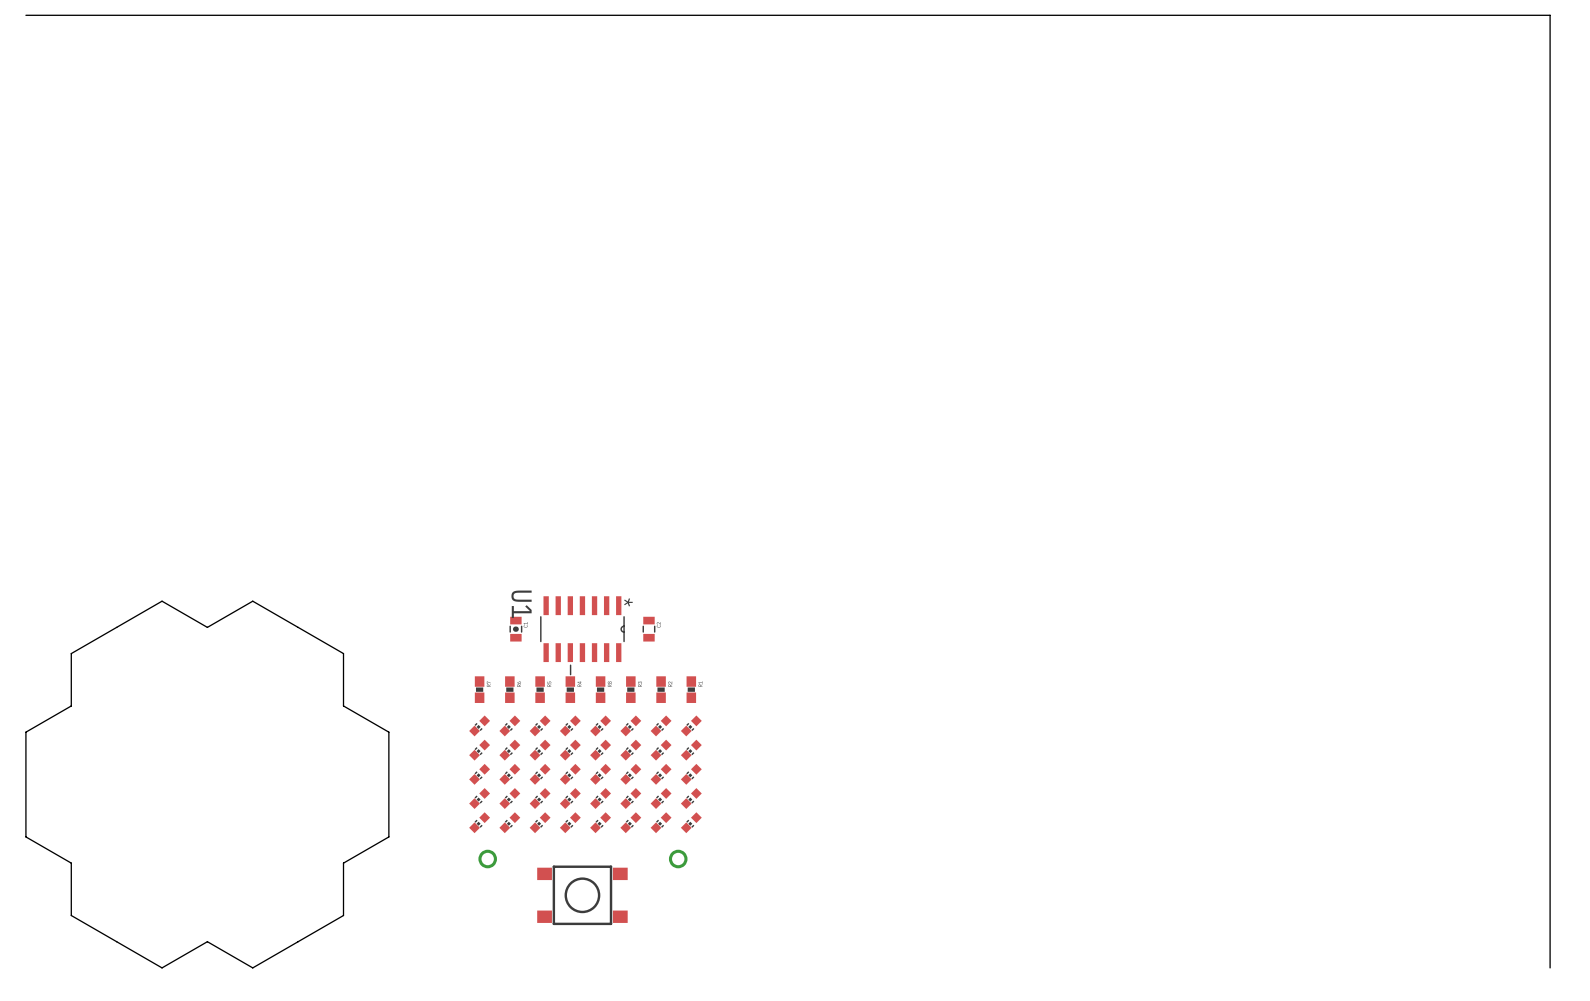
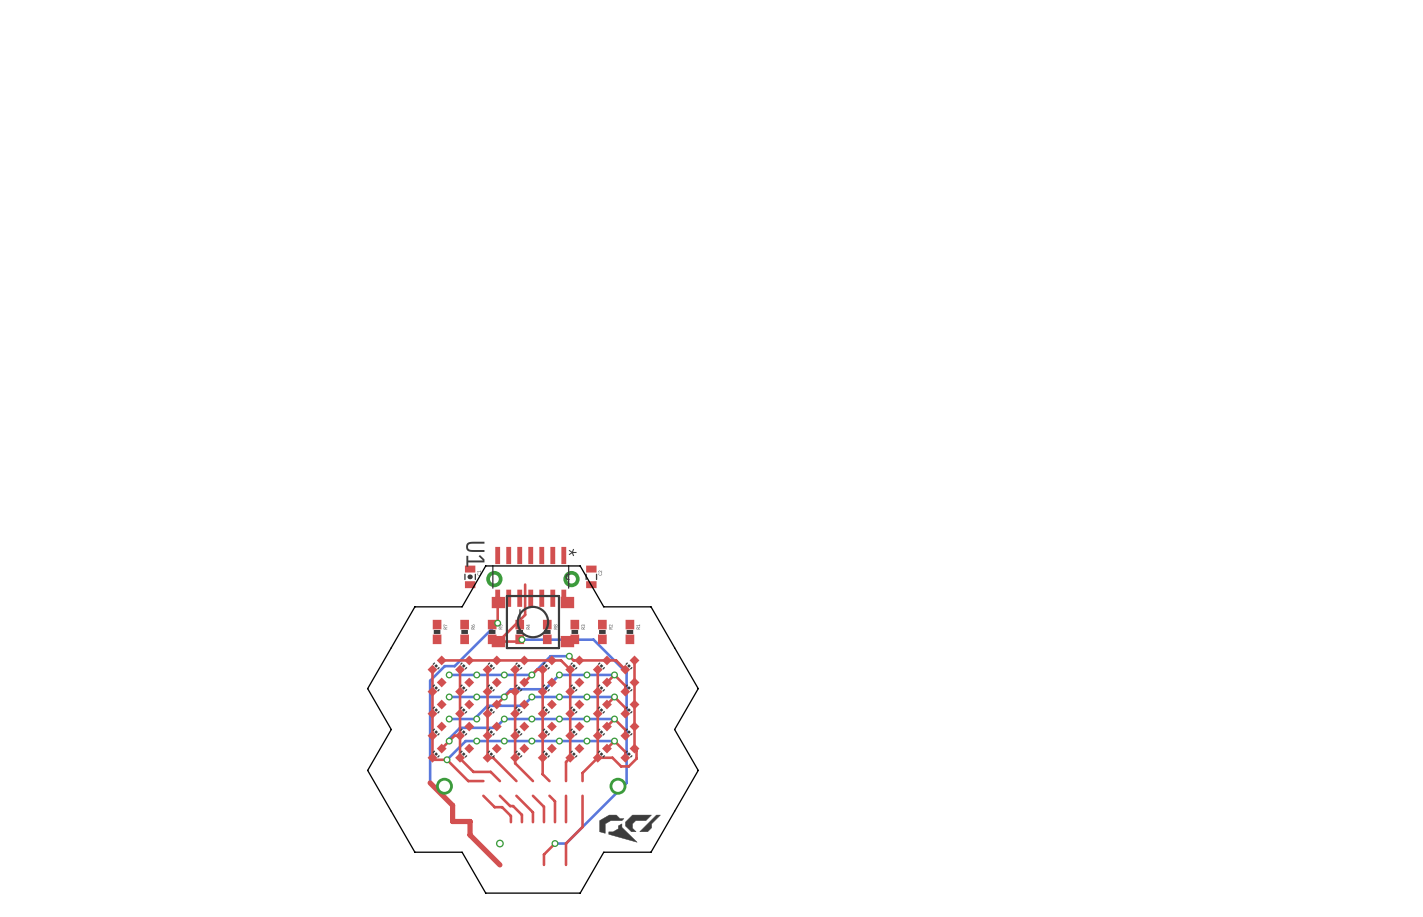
board edge: (25, 15) (1550, 15) (1550, 967) -> none
board edge: (162, 601) (207, 627) (252, 601) (343, 653) (343, 705) (388, 732) (388, 836) (343, 863) (343, 915) (252, 967) (207, 941) (162, 967) (71, 915) (71, 863) (25, 836) (25, 732) (71, 705) (71, 653) (162, 601) -> none
board edge: none -> (485, 565) (580, 565) (603, 606) (651, 606) (698, 688) (674, 729) (698, 770) (674, 811) (651, 852) (603, 852) (580, 893) (485, 893) (462, 852) (414, 852) (367, 770) (391, 729) (367, 688) (414, 606) (462, 606) (485, 565)
part: none -> (494, 579)
part: none -> (571, 579)
top track: none -> (525, 584) (525, 614) (498, 641) (520, 641) (521, 639)
top track: none -> (498, 602) (497, 623)
bottom track: none -> (497, 623) (454, 666) (444, 666) (430, 680) (430, 782)
via: none -> (497, 623)
bottom track: none -> (521, 639) (593, 639) (626, 672) (626, 782) (566, 843) (554, 843)
via: none -> (521, 639)
top track: none -> (569, 656) (573, 660) (616, 660) (625, 669)
bottom track: none -> (569, 656) (550, 656) (531, 674) (449, 674)
via: none -> (569, 656)
top track: none -> (441, 660) (561, 660) (570, 669) (570, 757) (566, 761) (566, 781)
top track: none -> (634, 660) (634, 748) (636, 750) (636, 758) (628, 766) (621, 766) (612, 757) (597, 757)
top track: none -> (432, 669) (432, 757) (434, 759) (447, 759) (468, 781) (483, 781)
top track: none -> (460, 669) (460, 758) (473, 771) (490, 771) (499, 781)
top track: none -> (487, 669) (487, 757) (493, 757) (516, 781)
top track: none -> (515, 669) (515, 763) (532, 781)
top track: none -> (597, 669) (597, 757)
via: none -> (449, 674)
via: none -> (476, 674)
via: none -> (504, 674)
via: none -> (531, 674)
via: none -> (559, 674)
via: none -> (586, 674)
bottom track: none -> (614, 674) (559, 674) (545, 689) (510, 689) (504, 696) (449, 696)
via: none -> (614, 674)
top track: none -> (524, 682) (537, 669) (542, 669) (542, 774) (549, 781)
top track: none -> (606, 682) (614, 674) (625, 685) (625, 691)
top track: none -> (515, 691) (509, 691) (496, 704)
via: none -> (449, 696)
via: none -> (476, 696)
via: none -> (504, 696)
via: none -> (531, 696)
via: none -> (559, 696)
via: none -> (586, 696)
bottom track: none -> (614, 696) (531, 696) (523, 705) (487, 705) (476, 716) (476, 719) (449, 719)
via: none -> (614, 696)
top track: none -> (606, 704) (614, 696) (625, 707) (625, 713)
via: none -> (449, 719)
via: none -> (476, 719)
via: none -> (504, 719)
via: none -> (531, 719)
via: none -> (559, 719)
via: none -> (586, 719)
bottom track: none -> (614, 719) (504, 719) (495, 727) (460, 727) (449, 738) (449, 741)
via: none -> (614, 719)
top track: none -> (606, 726) (614, 719) (625, 729) (625, 735)
top track: none -> (460, 735) (454, 735) (441, 748)
via: none -> (449, 741)
via: none -> (476, 741)
via: none -> (504, 741)
via: none -> (531, 741)
via: none -> (559, 741)
via: none -> (586, 741)
bottom track: none -> (614, 741) (465, 741) (447, 759)
via: none -> (614, 741)
top track: none -> (606, 748) (614, 741) (625, 751) (625, 757)
top track: none -> (597, 757) (582, 773) (582, 781)
via: none -> (447, 759)
top track: none -> (430, 782) (452, 805) (452, 821) (470, 821) (470, 835) (499, 864)
top track: none -> (483, 795) (494, 807) (502, 807) (510, 815) (510, 822)
top track: none -> (499, 795) (521, 814) (521, 822)
top track: none -> (516, 795) (532, 812) (532, 822)
top track: none -> (532, 795) (543, 806) (543, 822)
top track: none -> (549, 795) (554, 801) (554, 822)
top track: none -> (566, 795) (566, 822)
top track: none -> (582, 795) (582, 827) (566, 843) (566, 864)
drawing: none -> [599, 814, 661, 843]
part position: (582, 895) -> (532, 622)
via: none -> (499, 843)
top track: none -> (554, 843) (543, 854) (543, 864)
via: none -> (554, 843)

